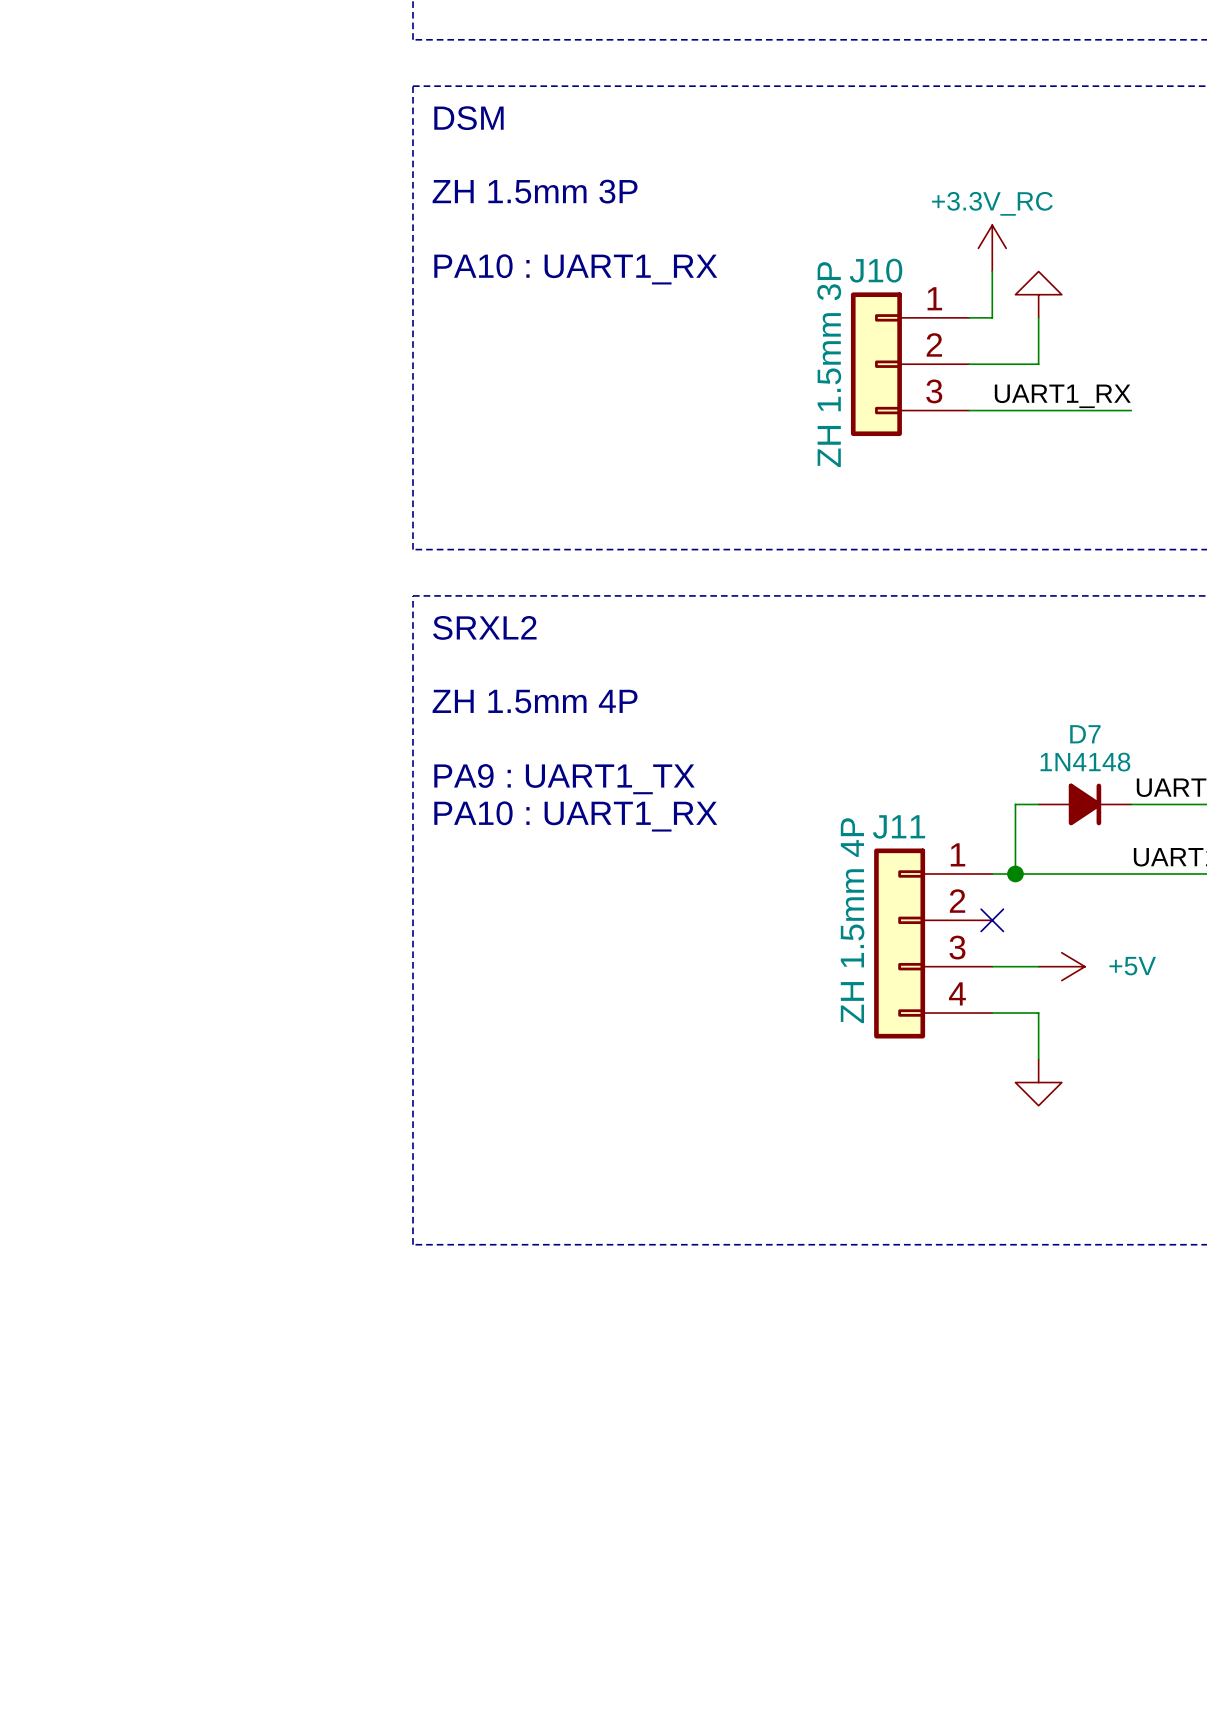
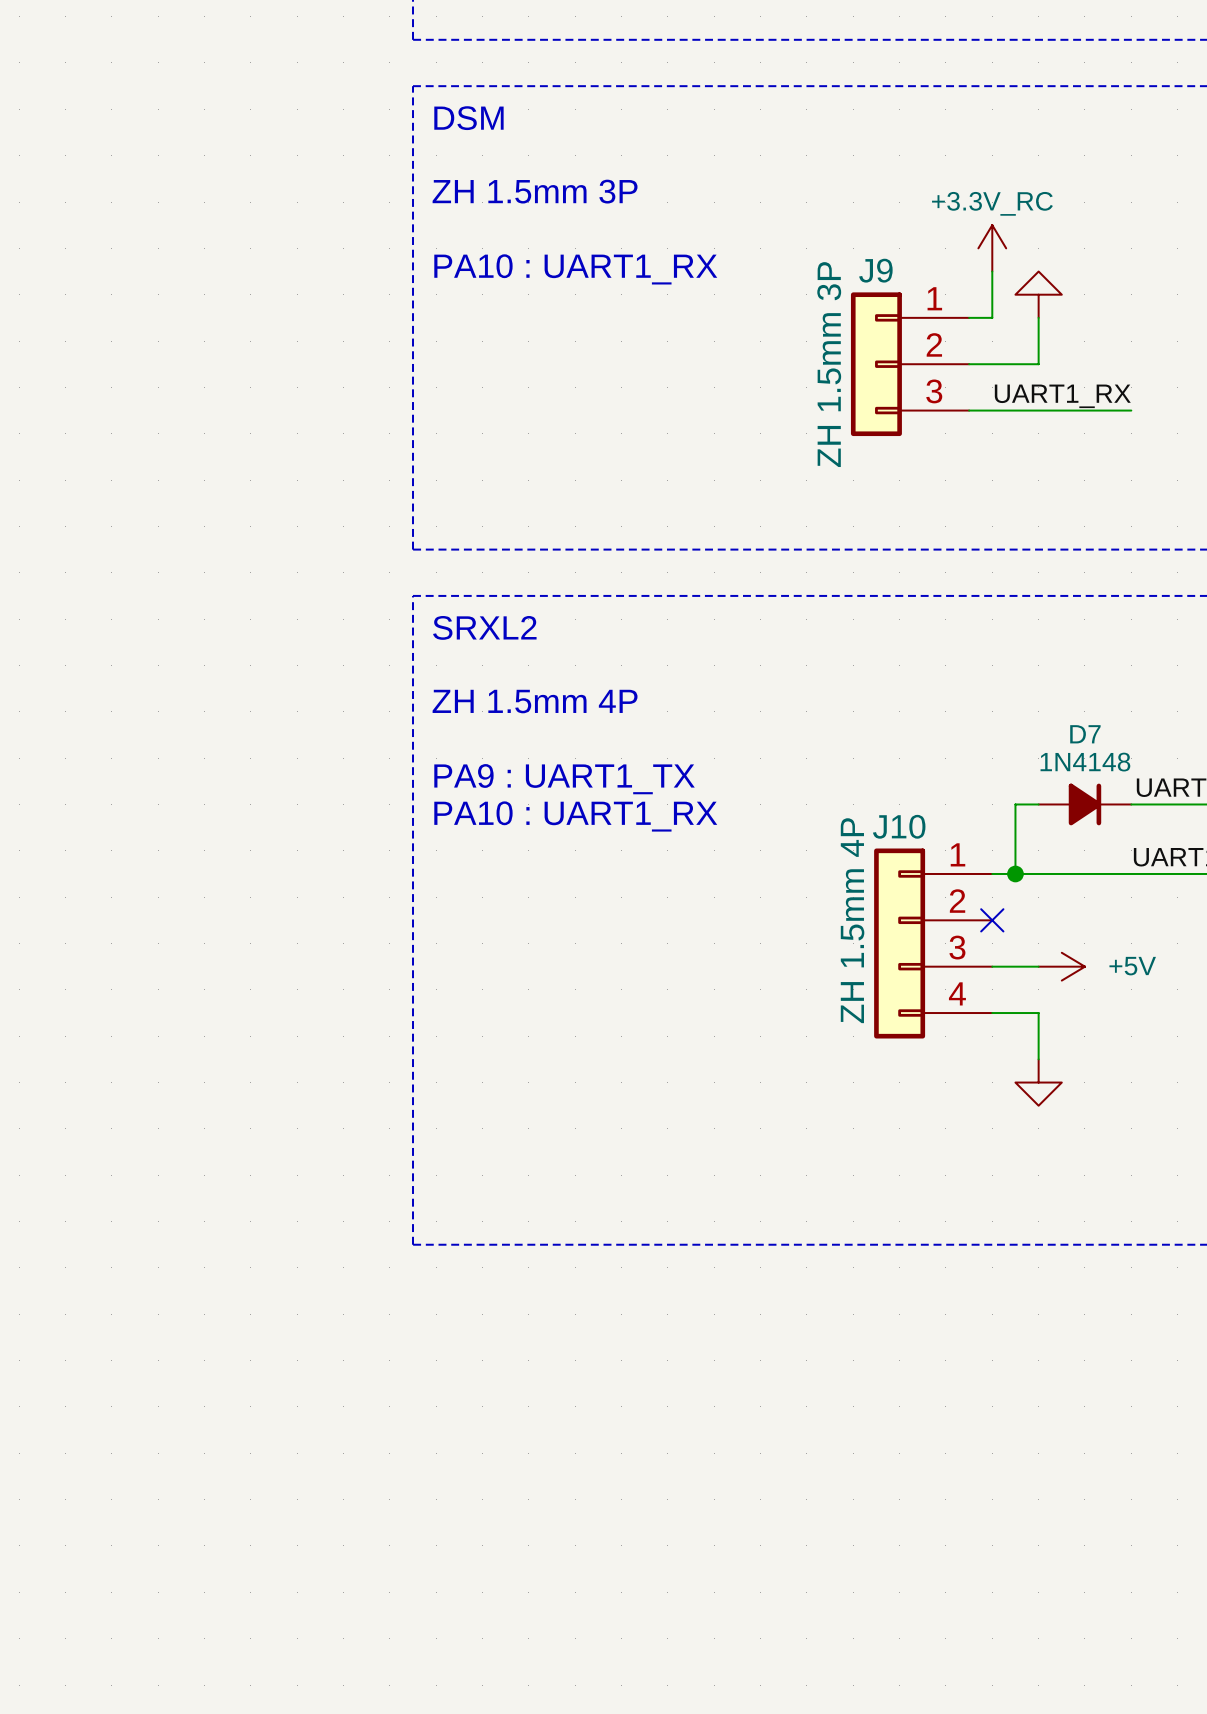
J10 name: J10 (876, 270) -> J9 (875, 270)
J11 name: J11 (899, 826) -> J10 (899, 826)

